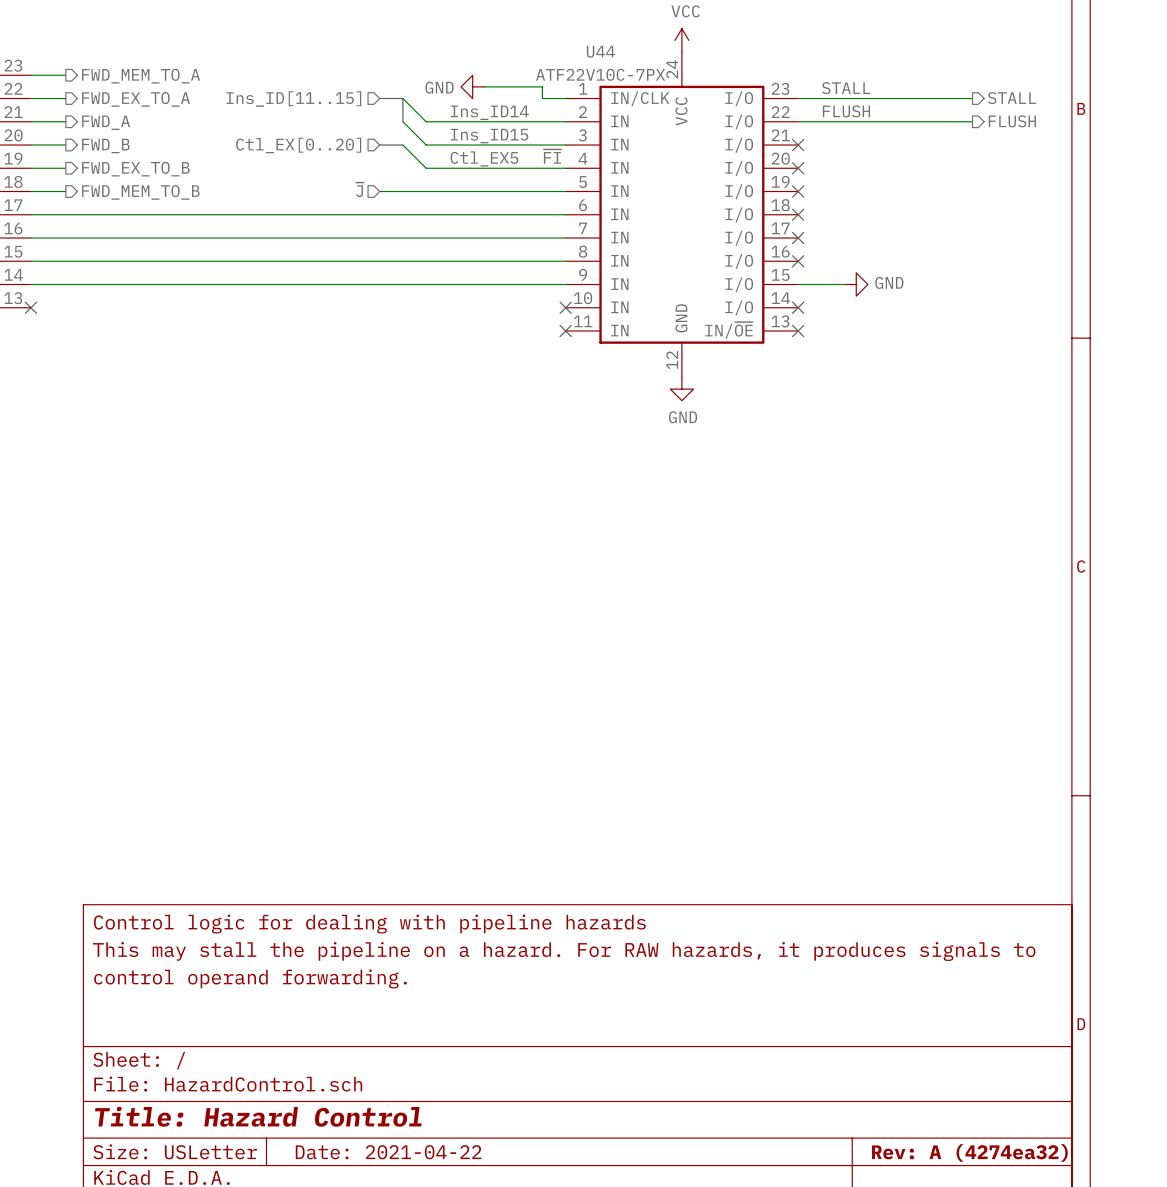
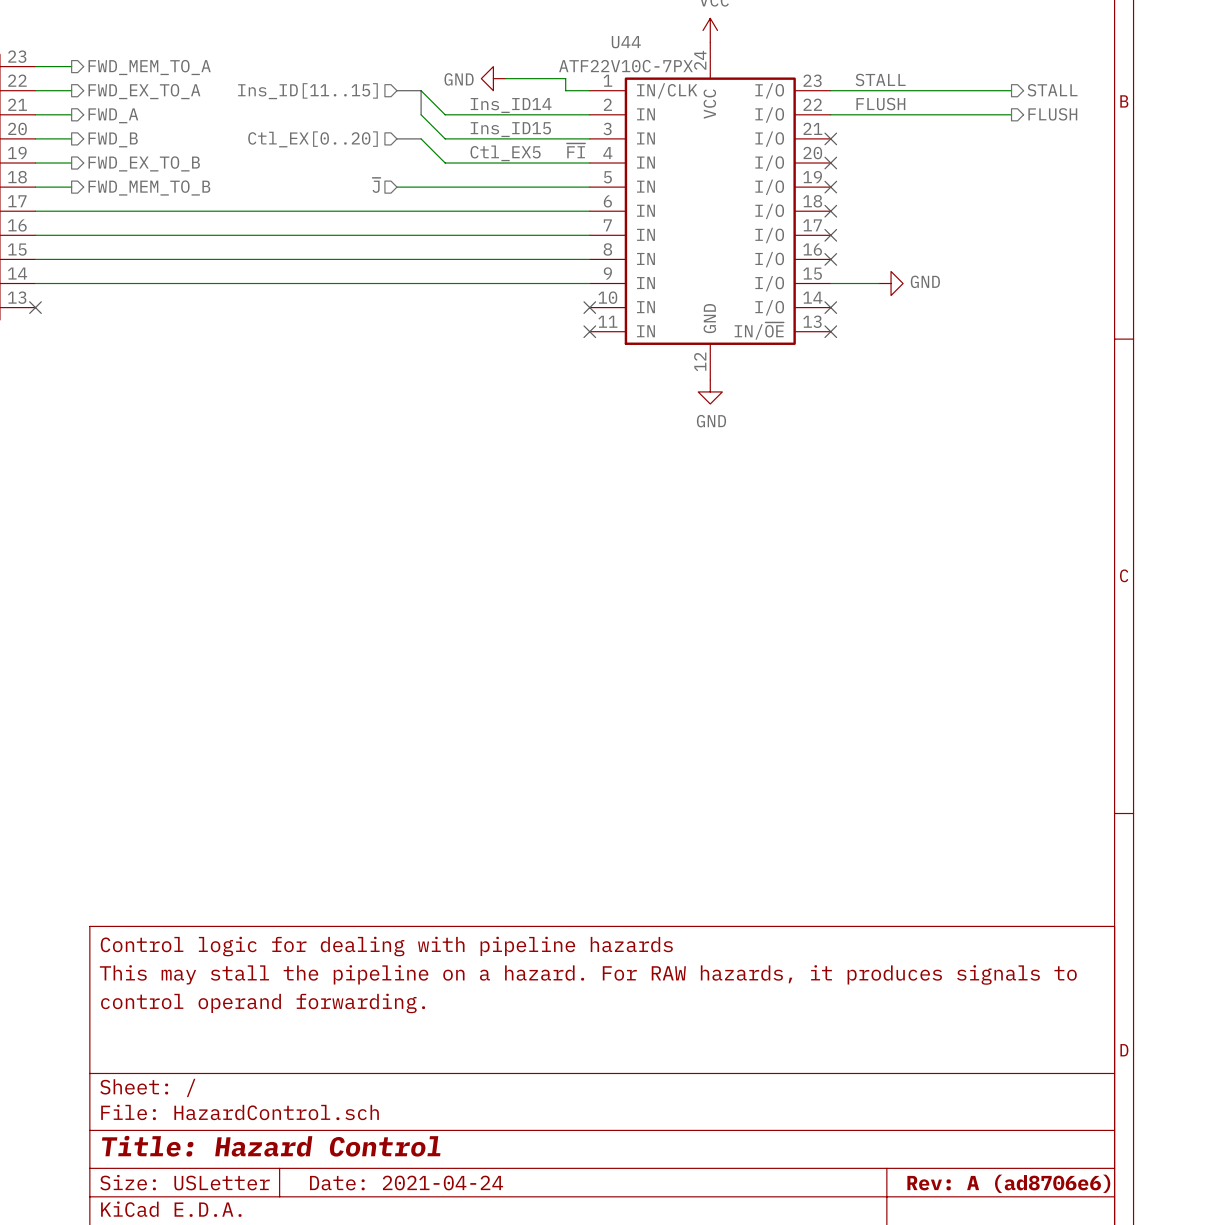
title block: Date: 2021-04-22 (388, 1152) -> Date: 2021-04-24 (406, 1183)
title block: Rev: A (4274ea32) (969, 1152) -> Rev: A (ad8706e6) (1008, 1183)

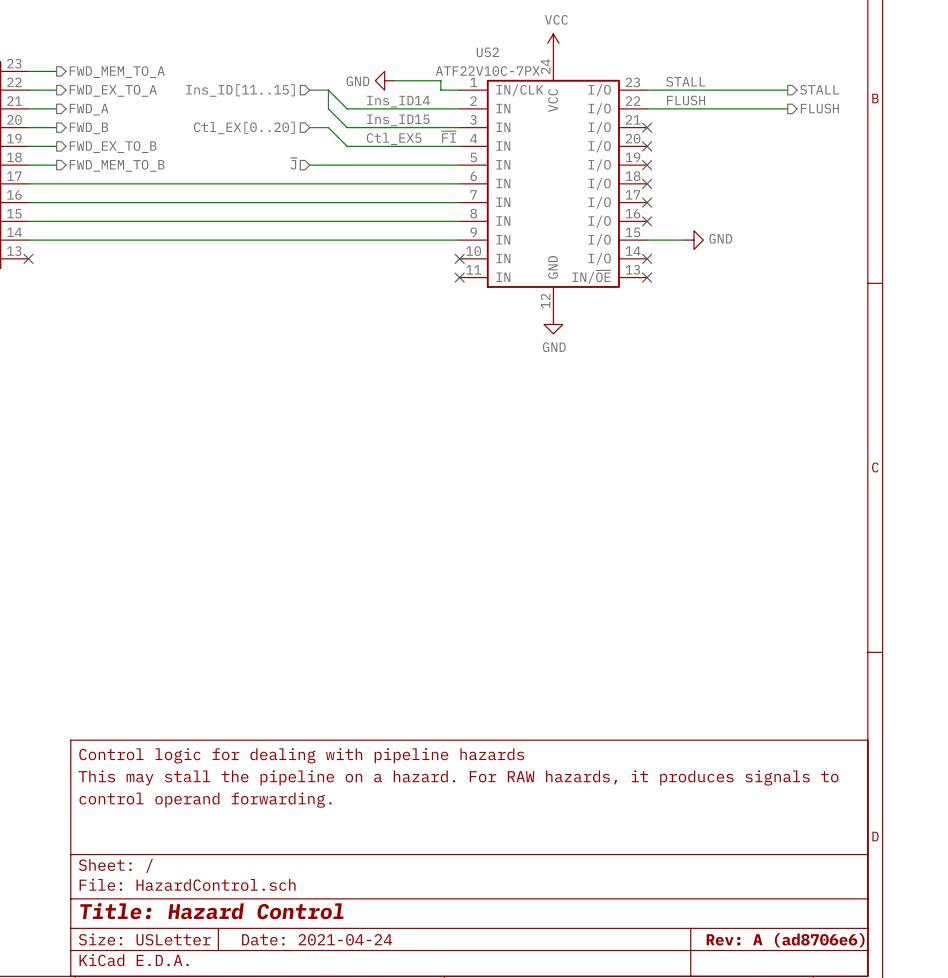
U44 name: U44 (626, 42) -> U52 (487, 52)

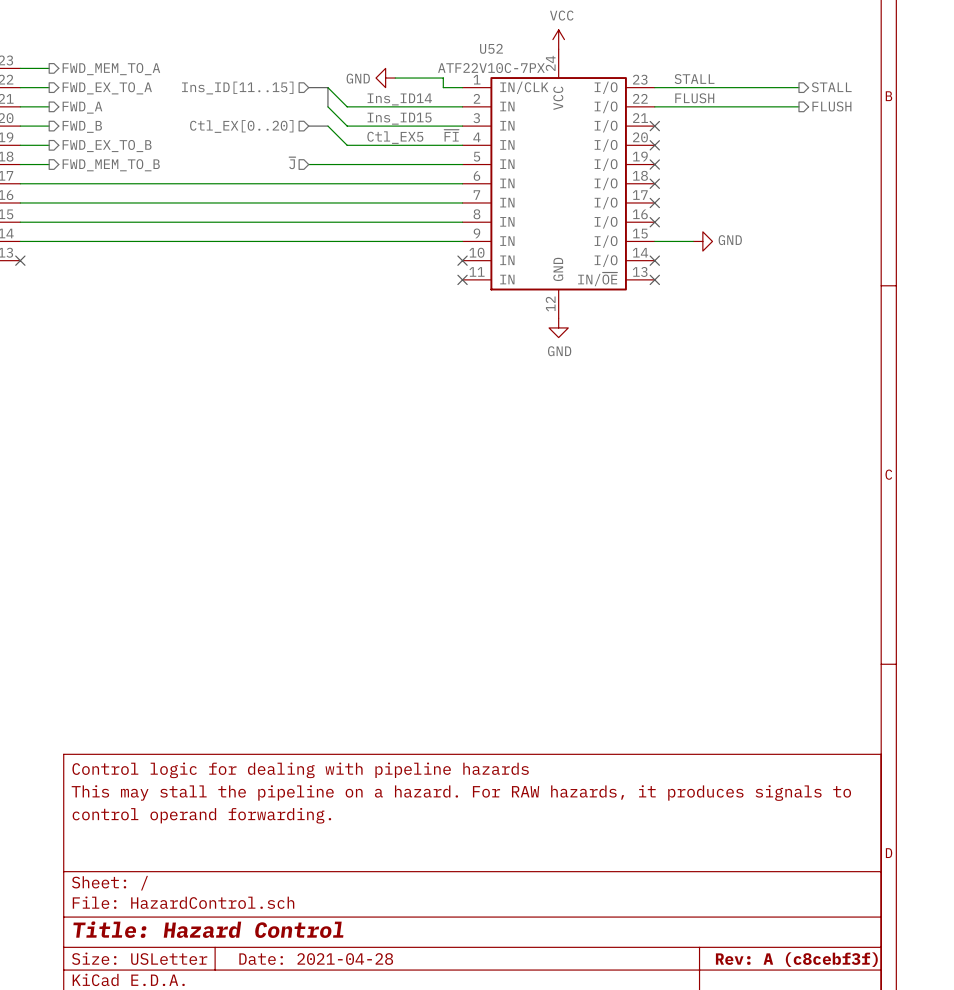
title block: Date: 2021-04-24 (317, 939) -> Date: 2021-04-28 (316, 959)
title block: Rev: A (ad8706e6) (785, 940) -> Rev: A (c8cebf3f) (796, 959)

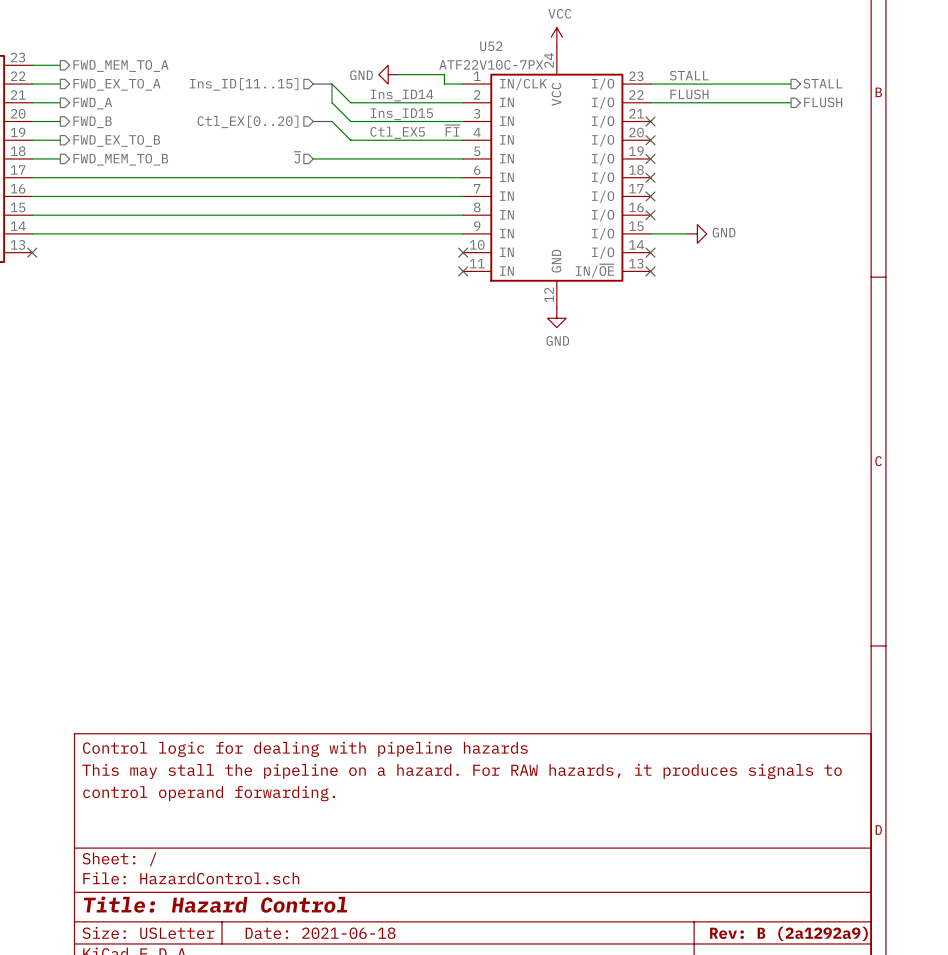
title block: Date: 2021-04-28 (316, 959) -> Date: 2021-06-18 (320, 933)
title block: Rev: A (c8cebf3f) (796, 959) -> Rev: B (2a1292a9) (788, 933)

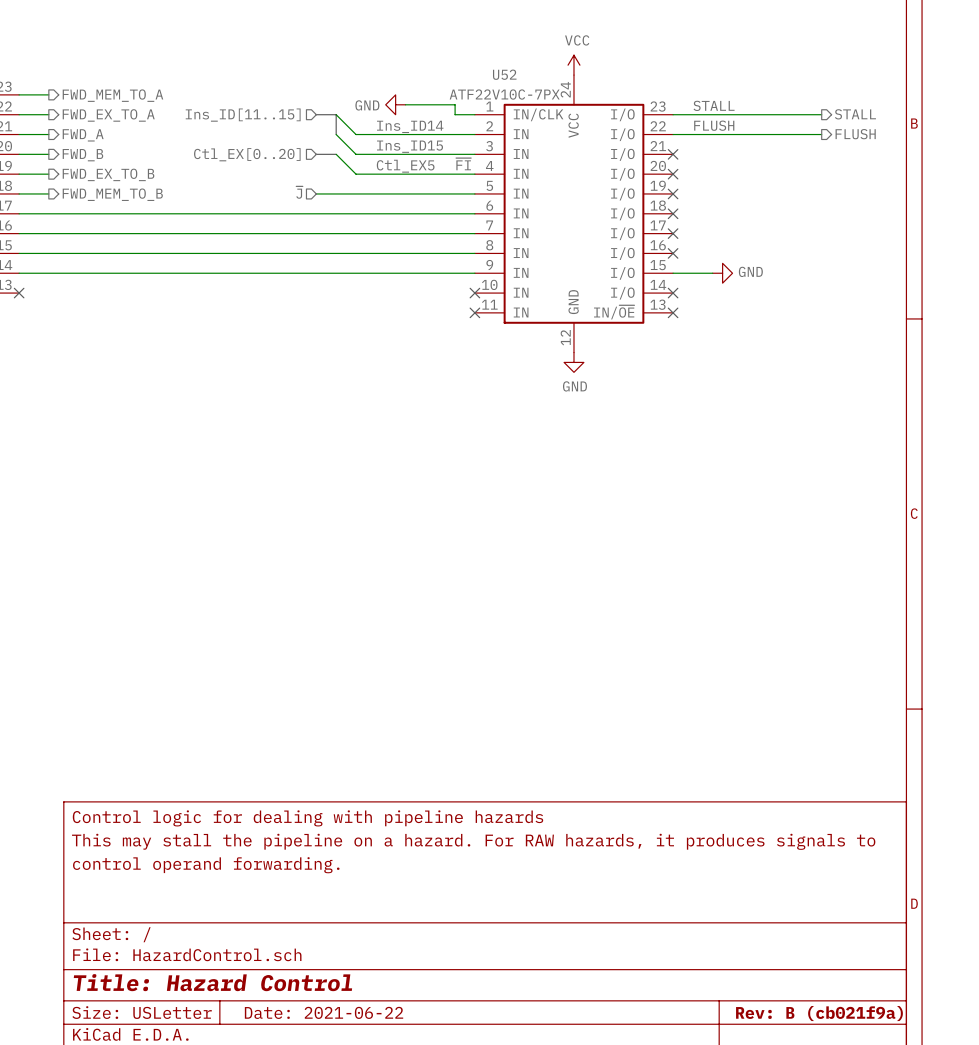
title block: Date: 2021-06-18 (320, 933) -> Date: 2021-06-22 (324, 1012)
title block: Rev: B (2a1292a9) (788, 933) -> Rev: B (cb021f9a) (819, 1013)

